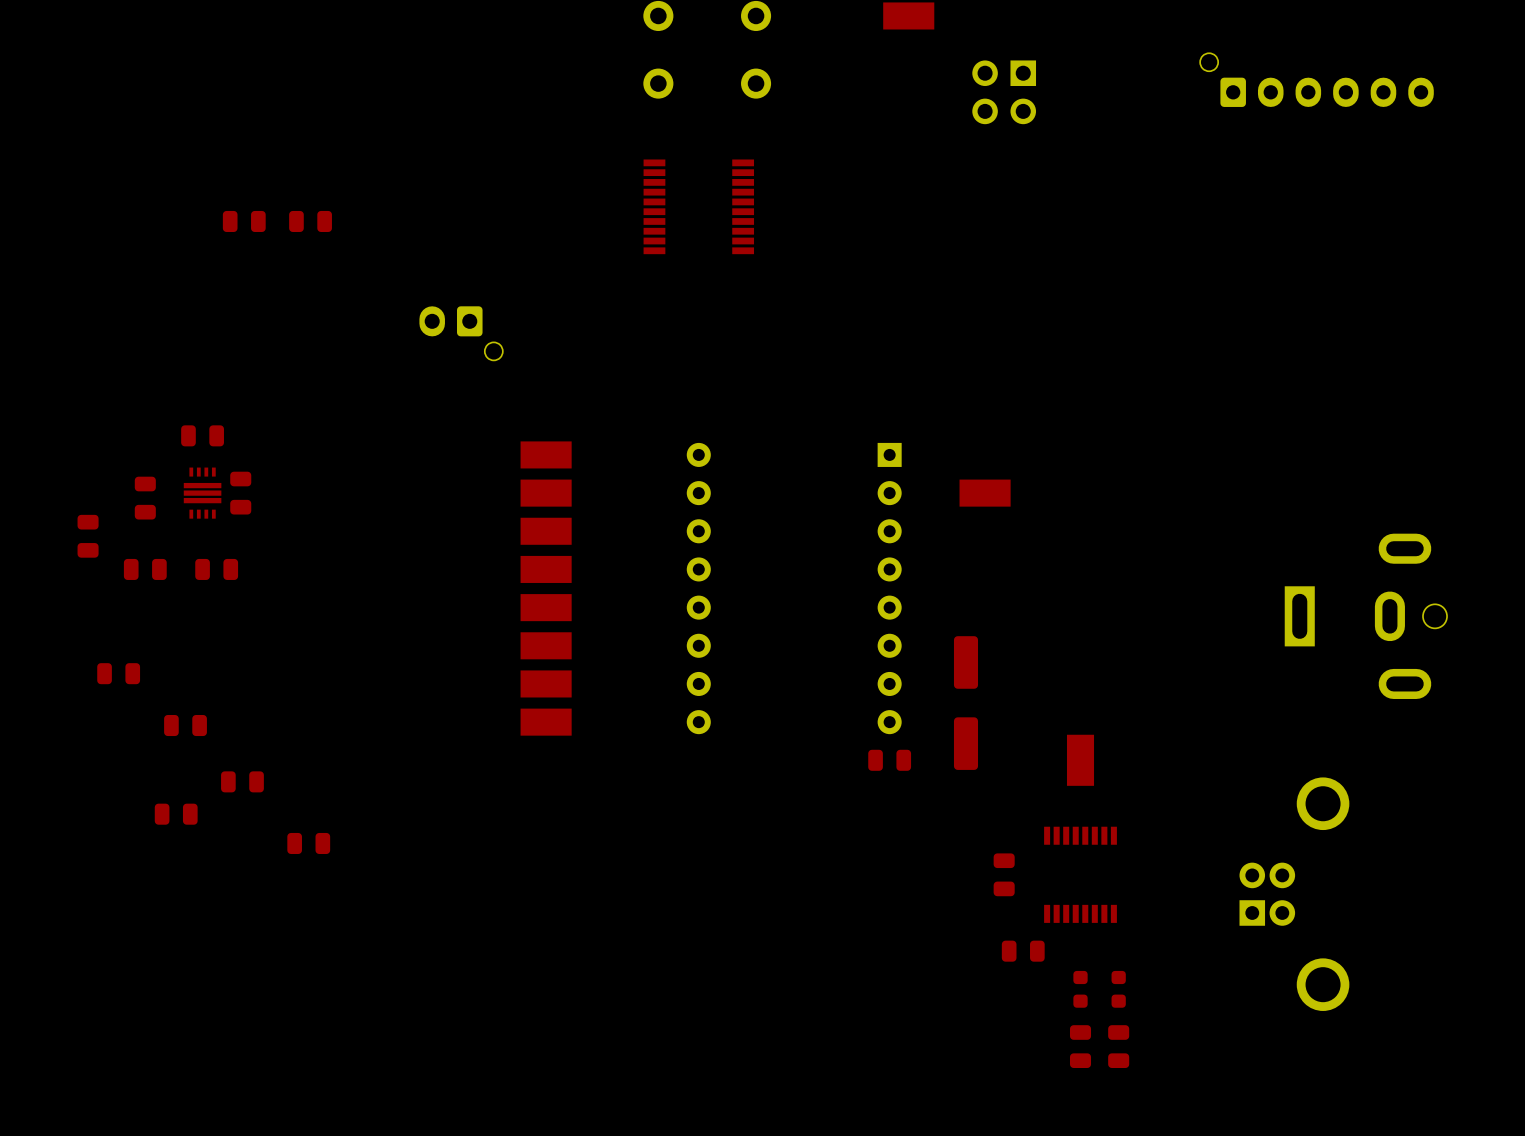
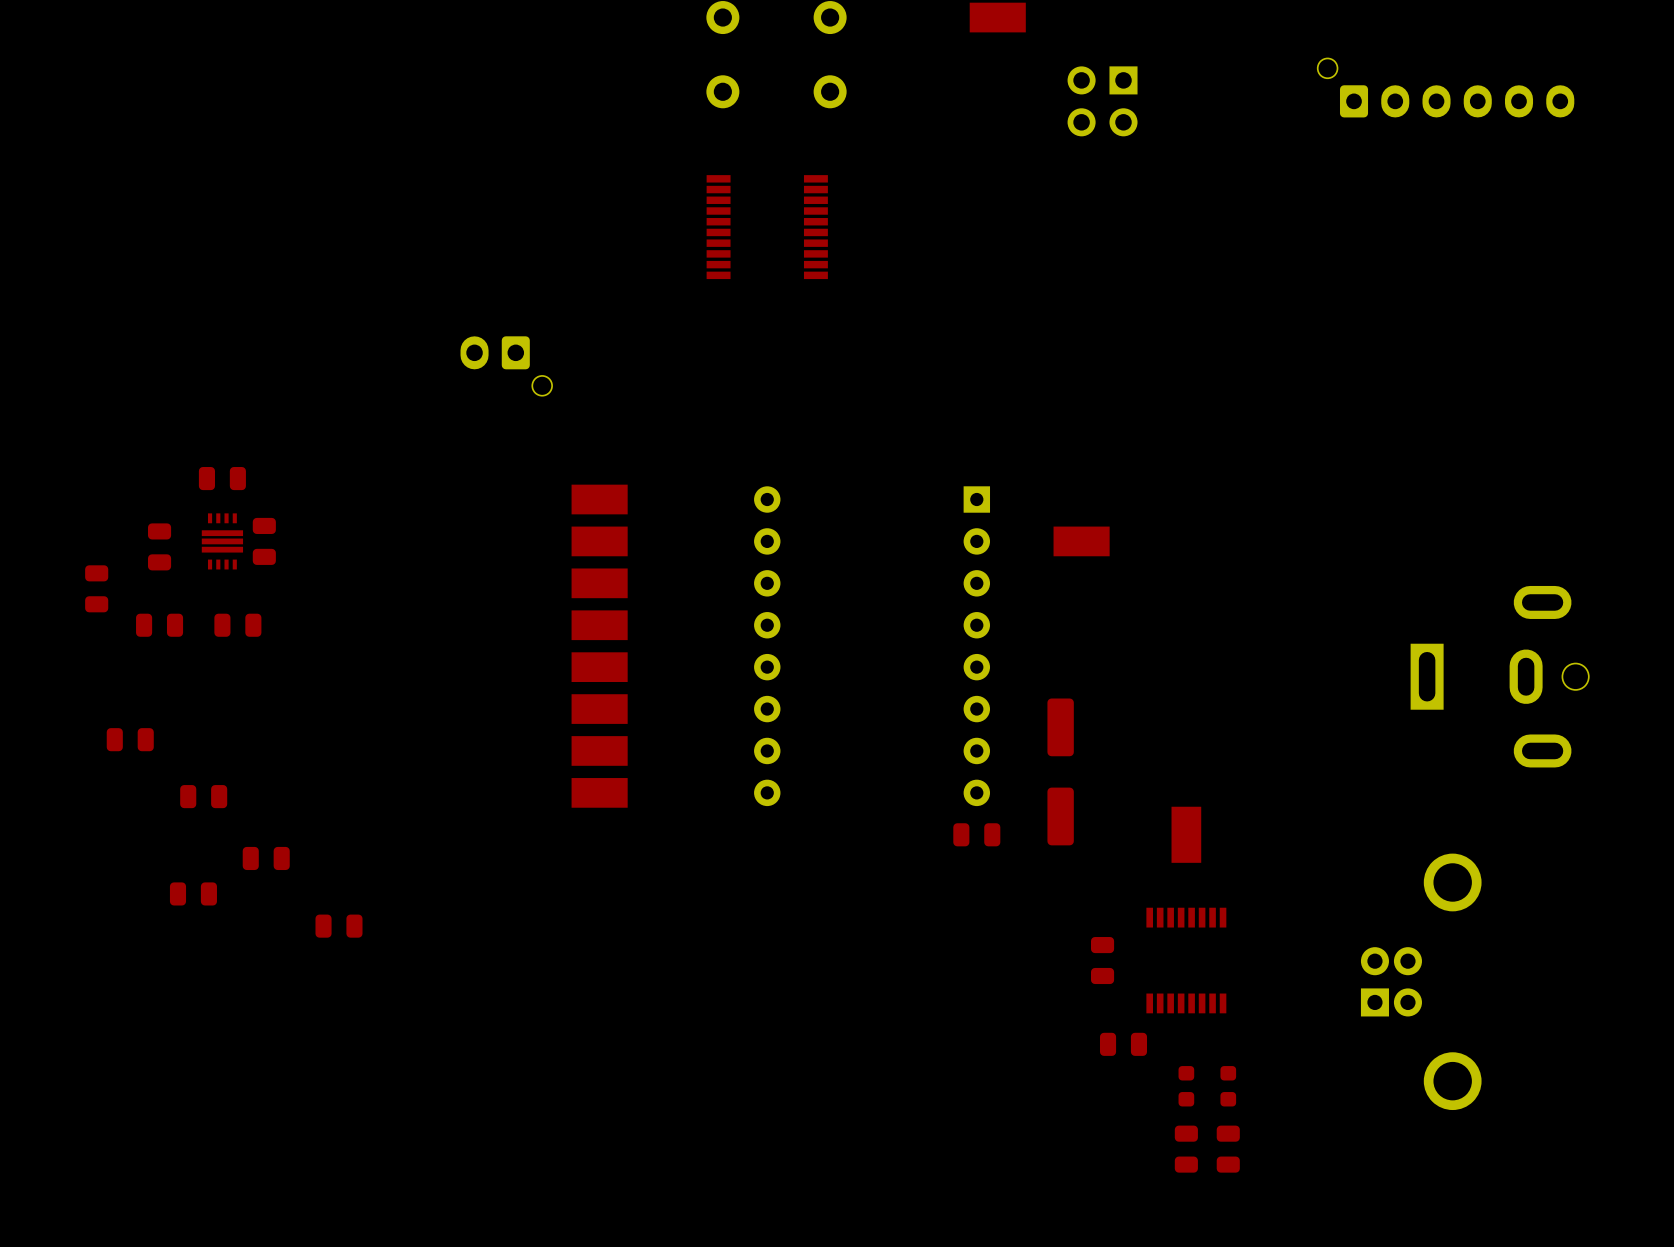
part: (244, 221) -> none
part: (310, 221) -> none

